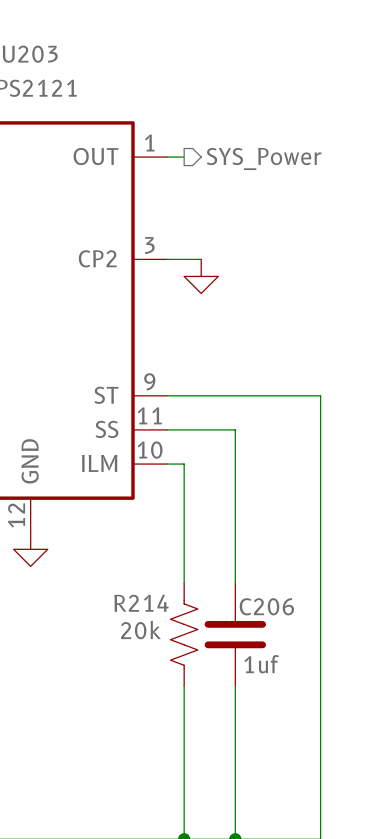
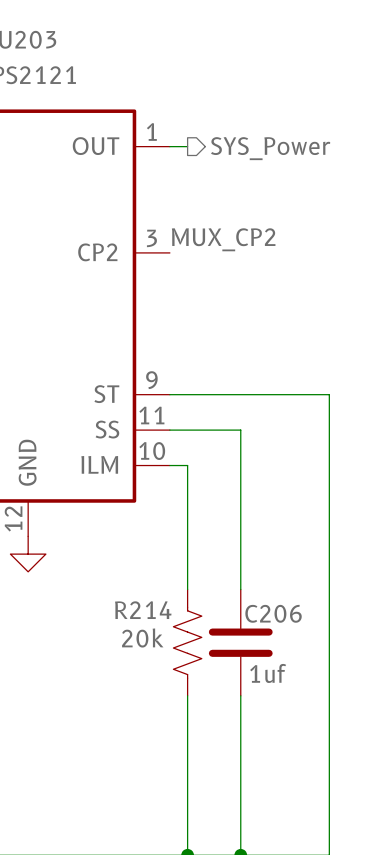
label: none -> MUX_CP2 (223, 239)
wire: (167, 259) (201, 259) -> none
power symbol: (201, 276) -> none

